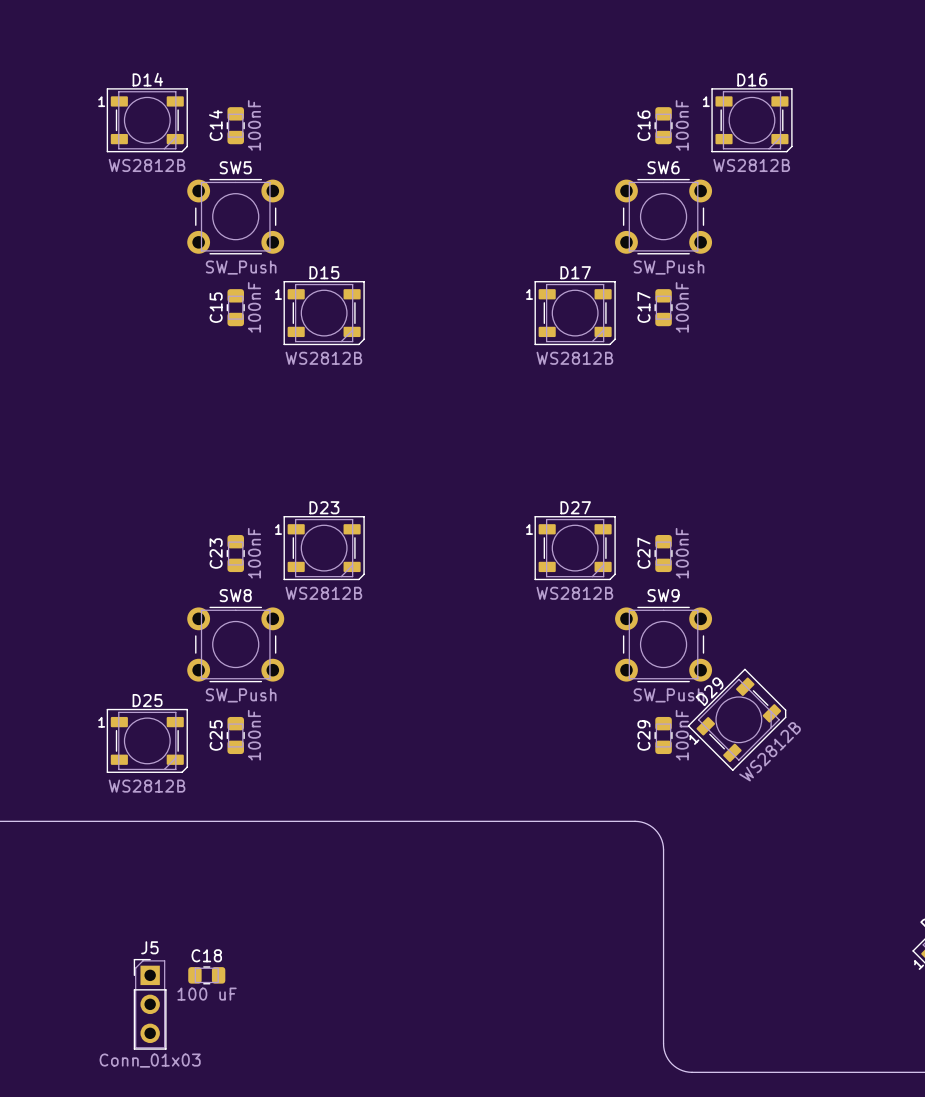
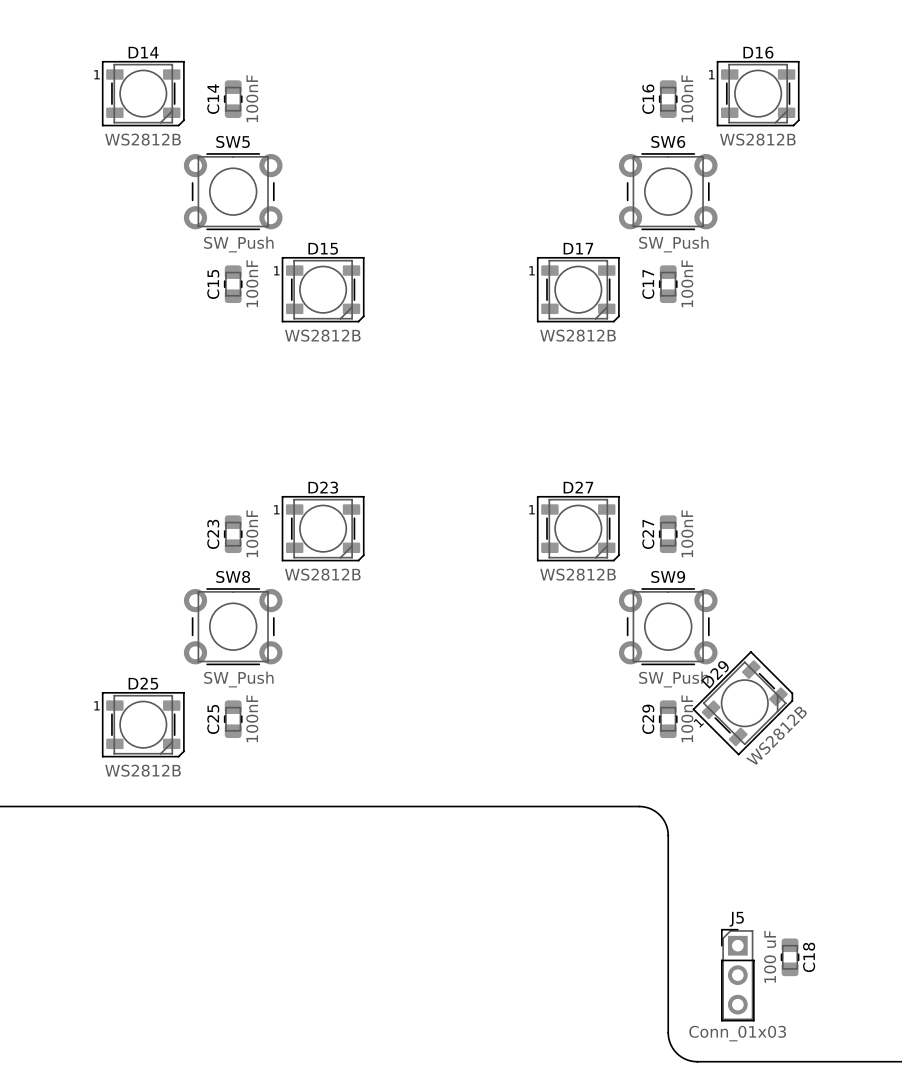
C18 rotation: 0° (206, 975) -> 90° clockwise (790, 957)
C18 position: (206, 975) -> (790, 957)
J5 position: (150, 1004) -> (737, 975)

